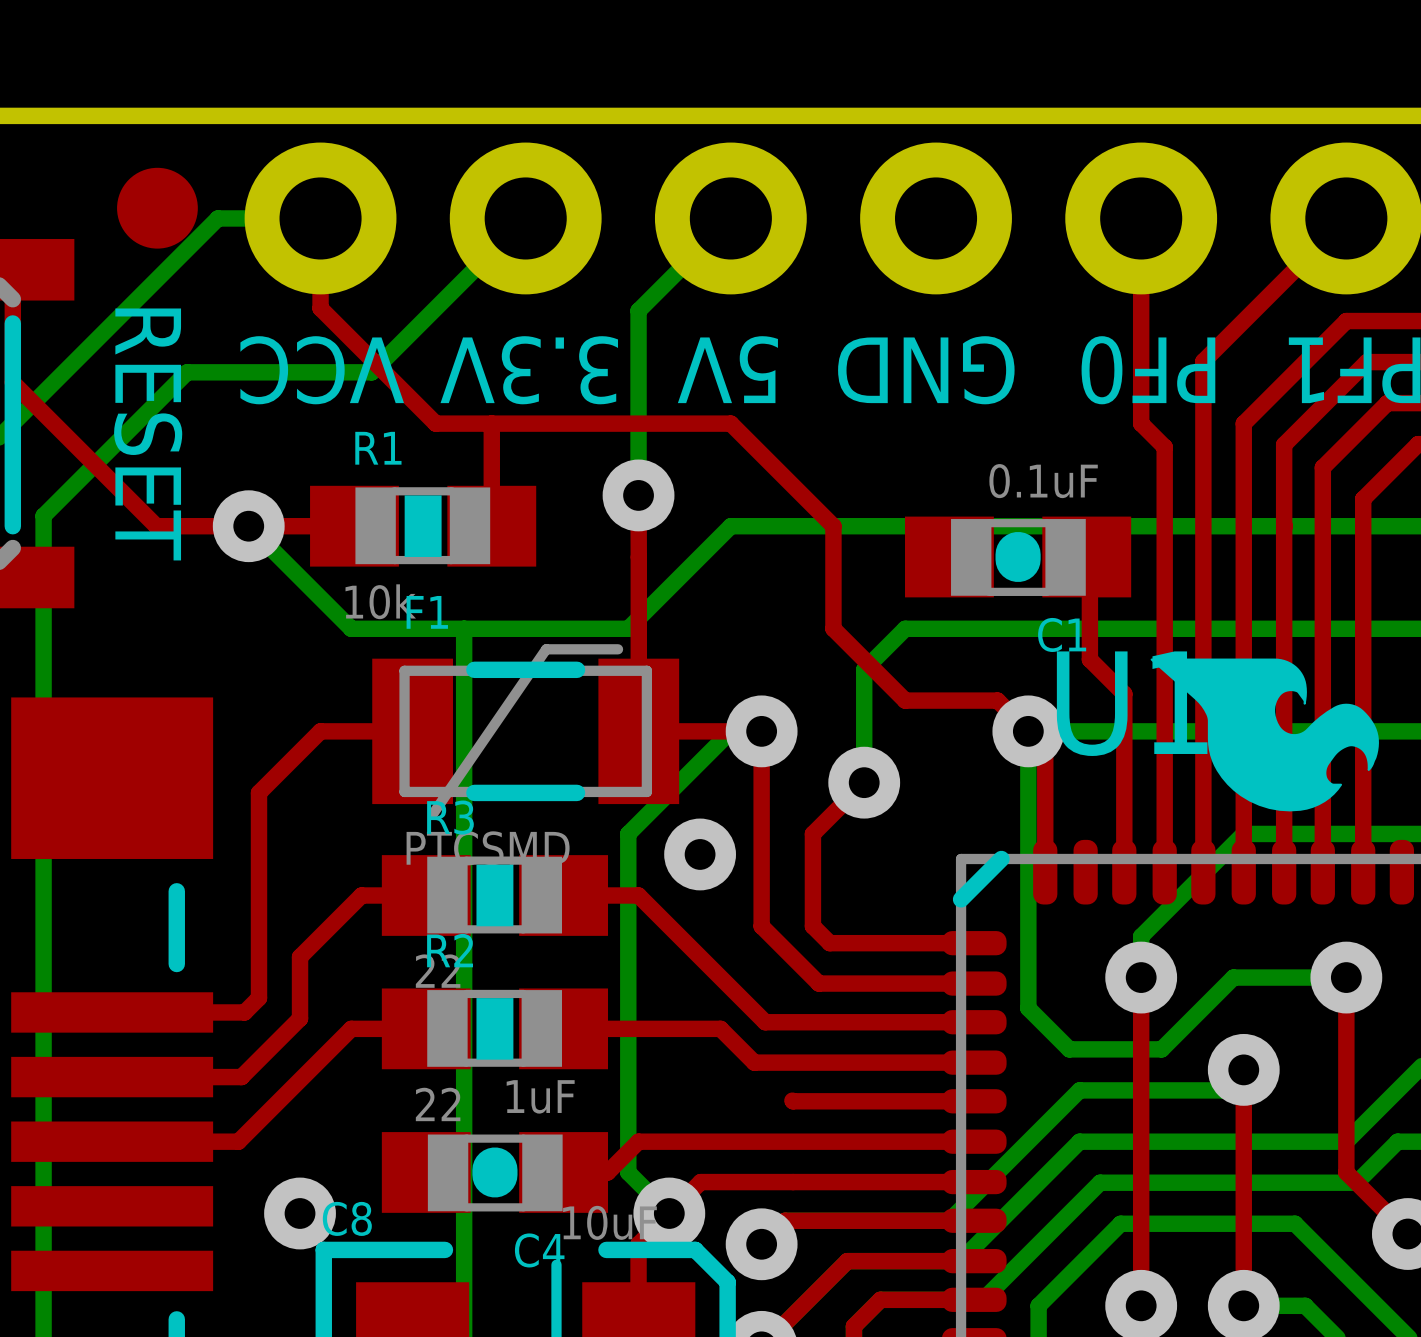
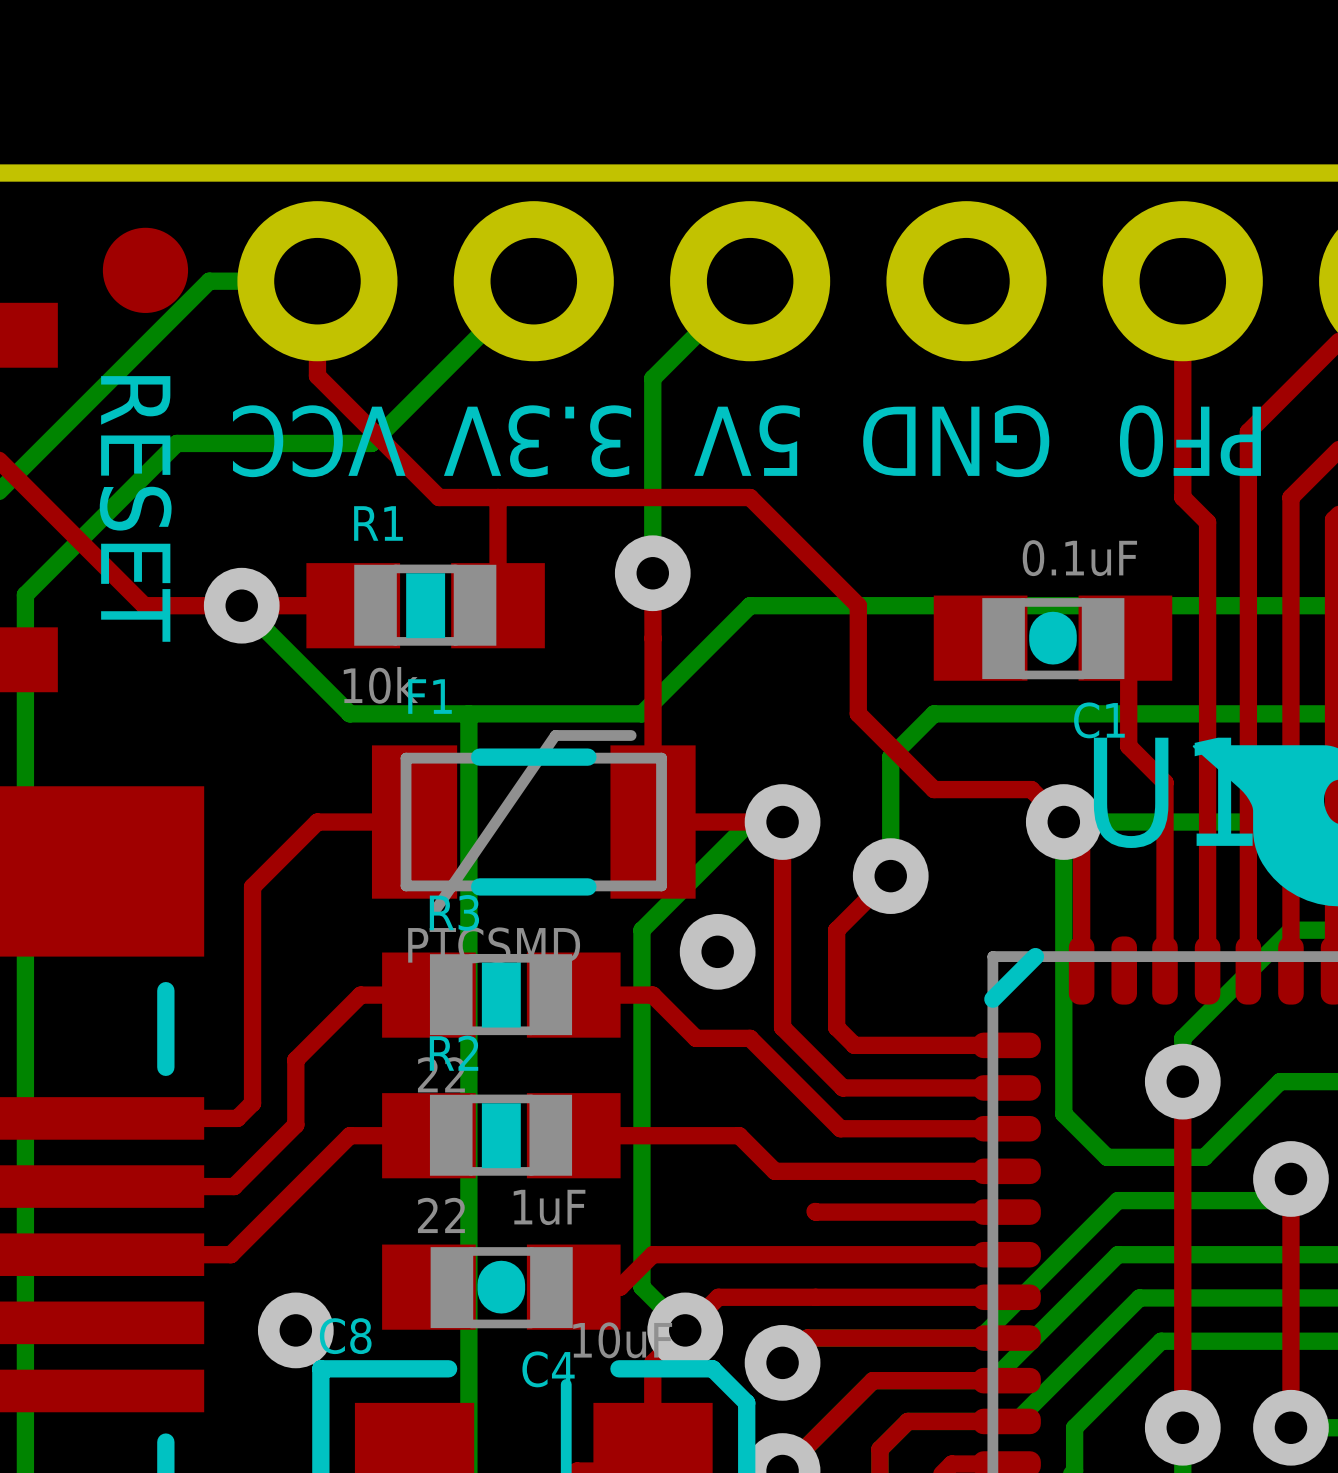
top track: (679, 936) (765, 1022) (816, 1022) -> (696, 1038) (750, 1038) (840, 1128)

